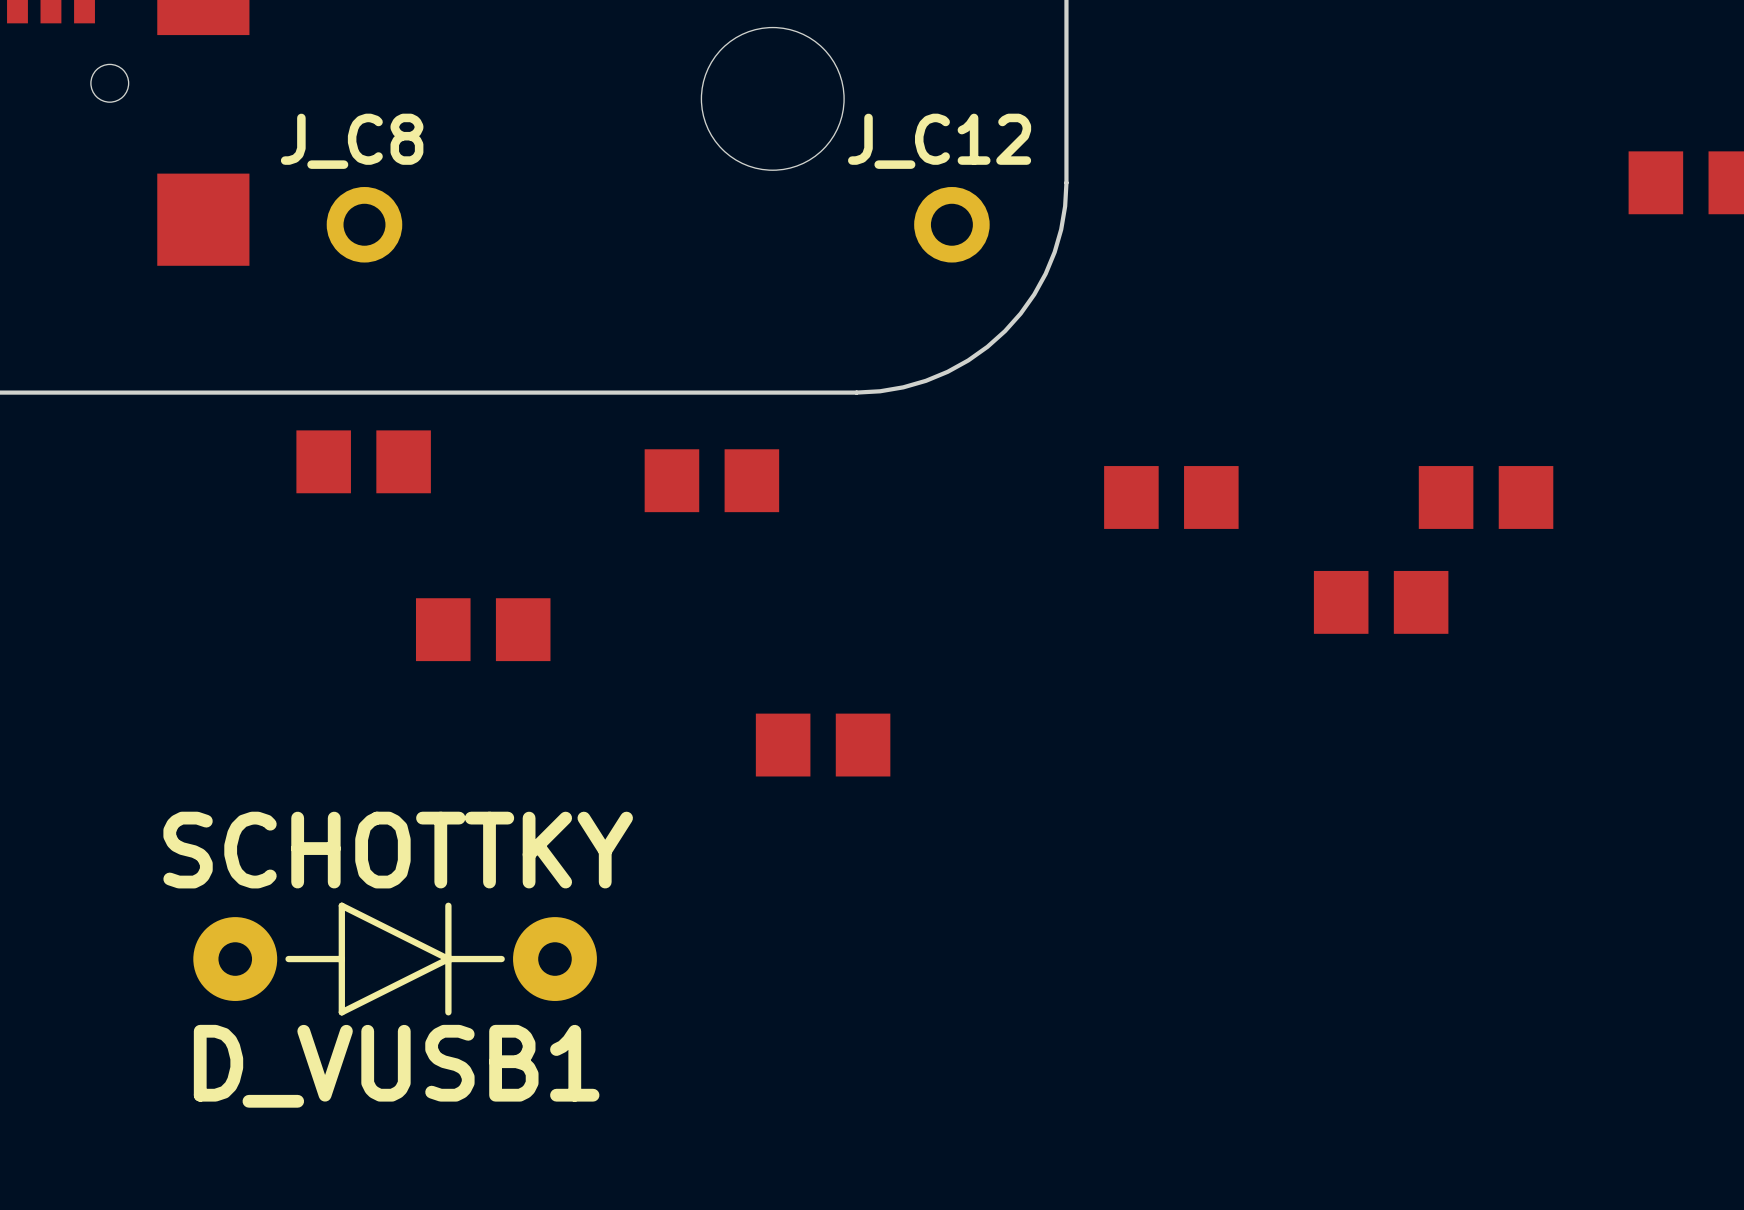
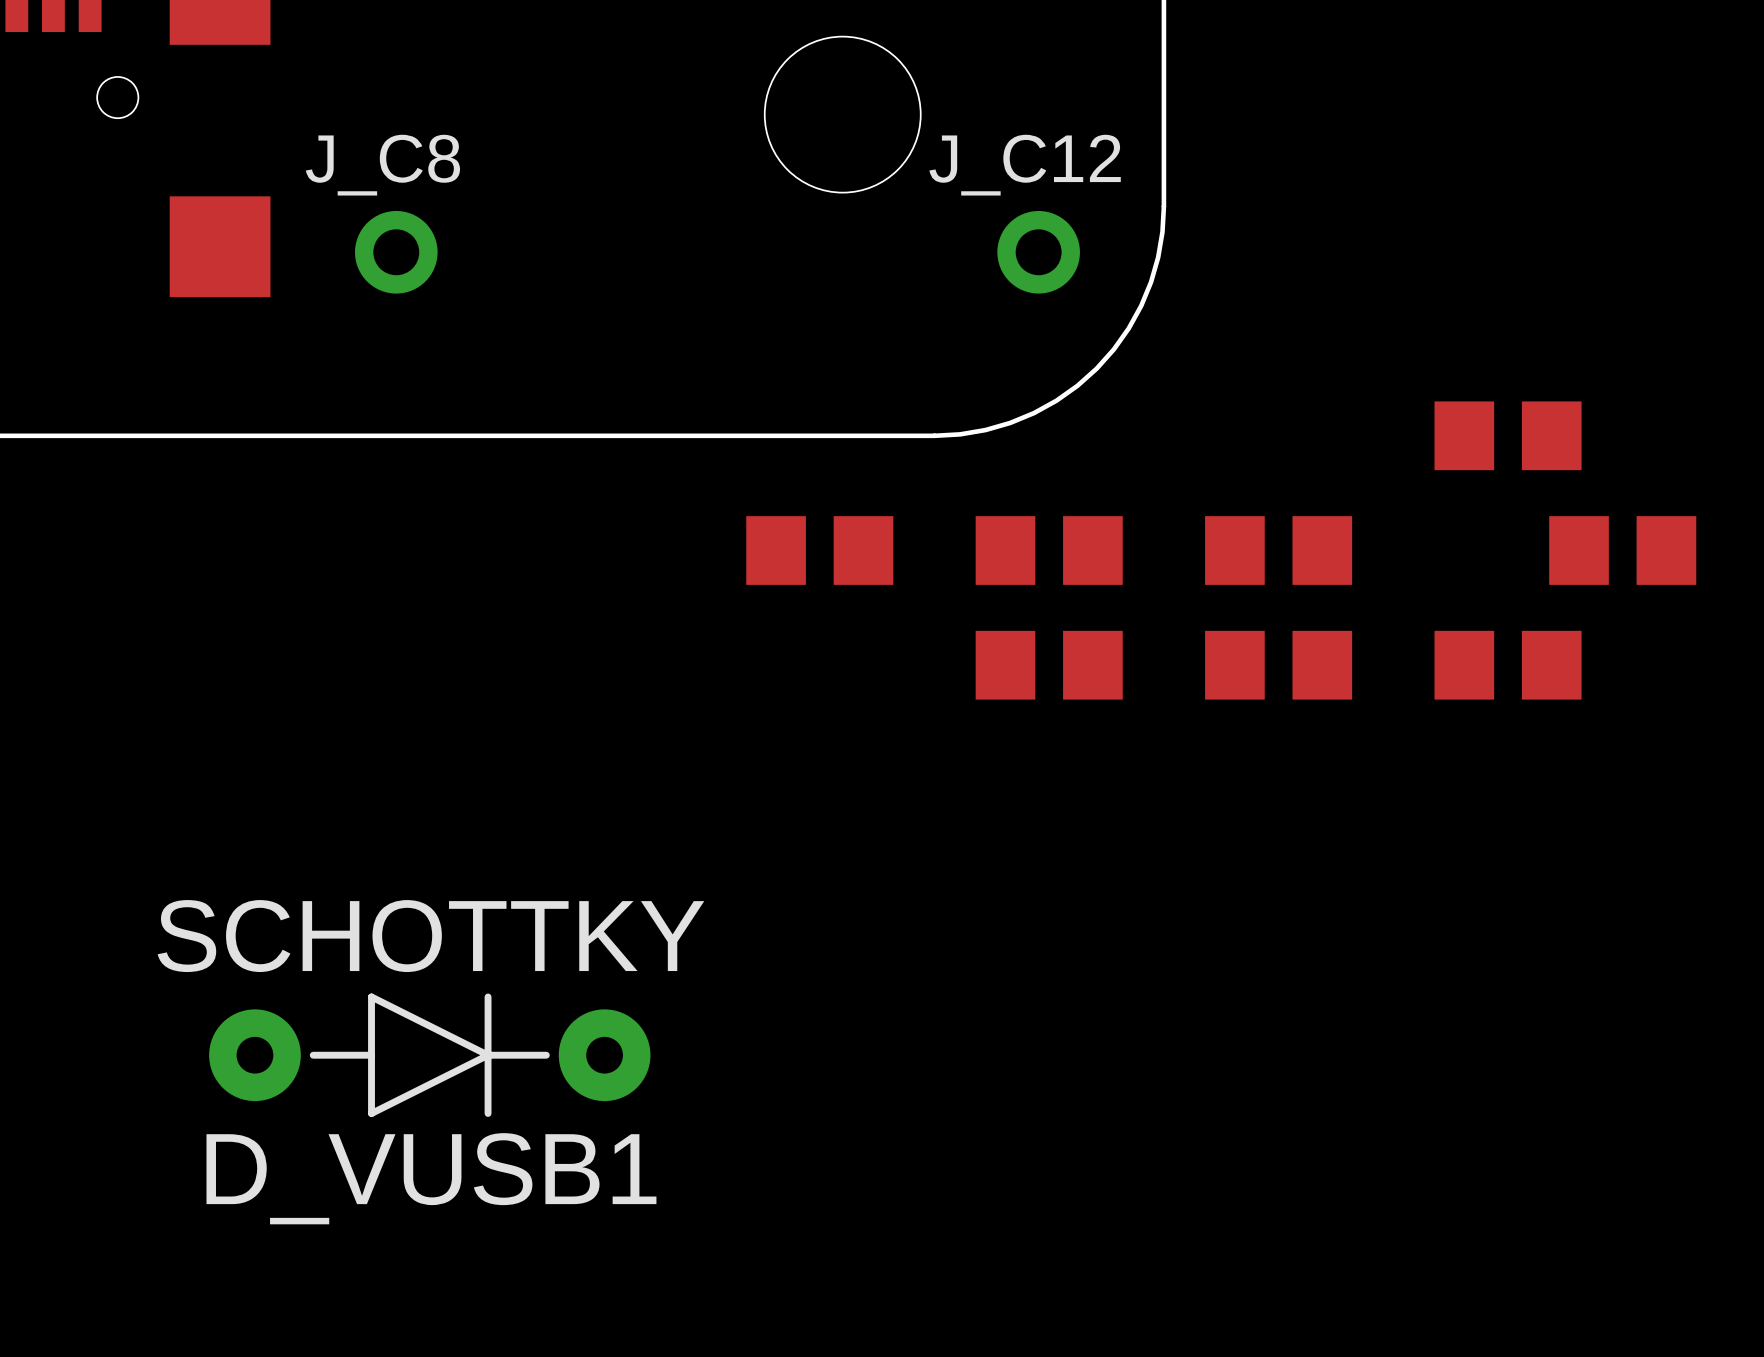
part: none -> (1508, 435)
part: (363, 461) -> none
part position: (711, 480) -> (819, 550)
part: none -> (1049, 550)
part: none -> (1049, 665)
part: none -> (1278, 665)
part: (483, 629) -> none
part: (823, 745) -> none

